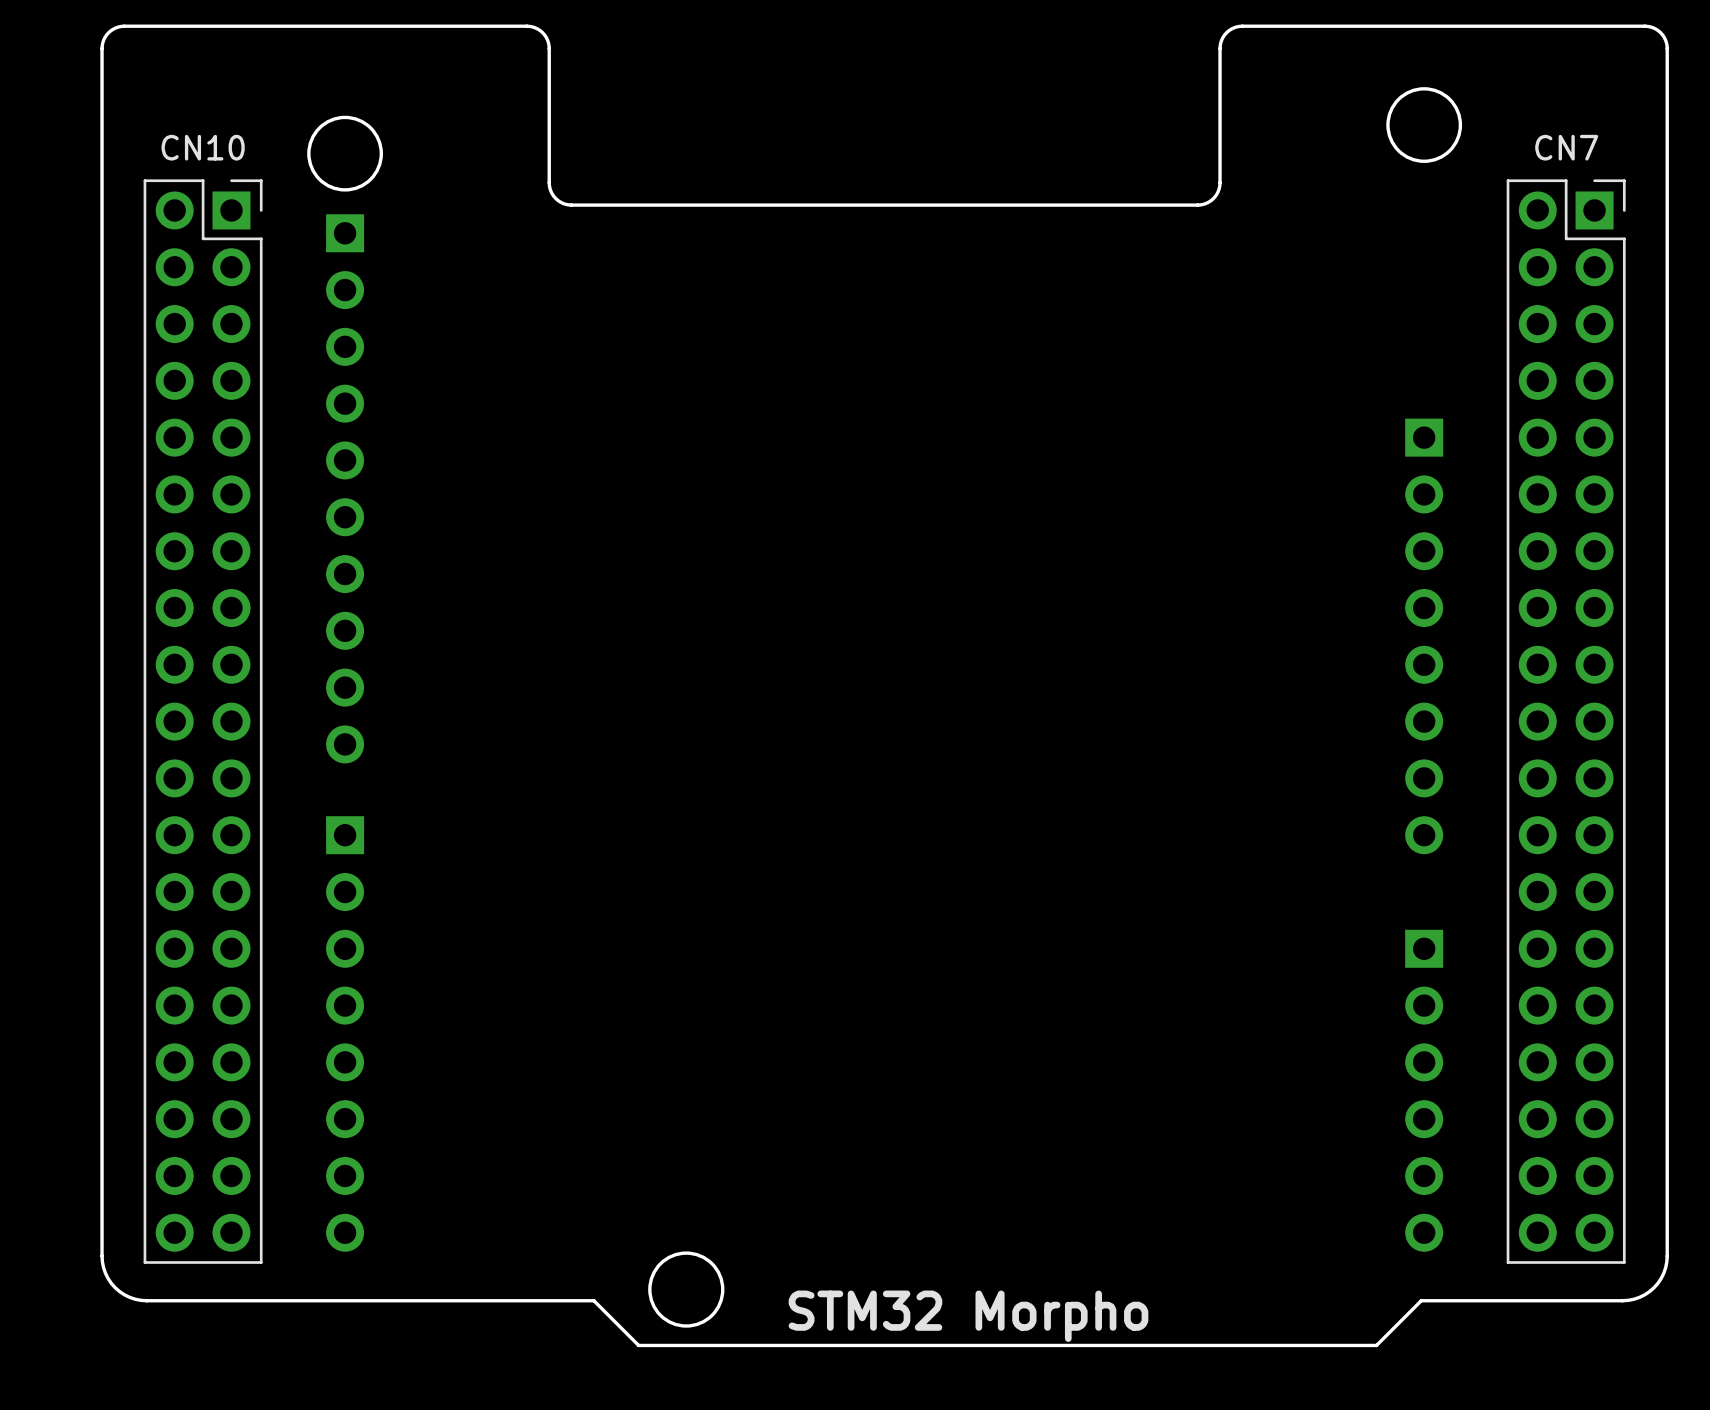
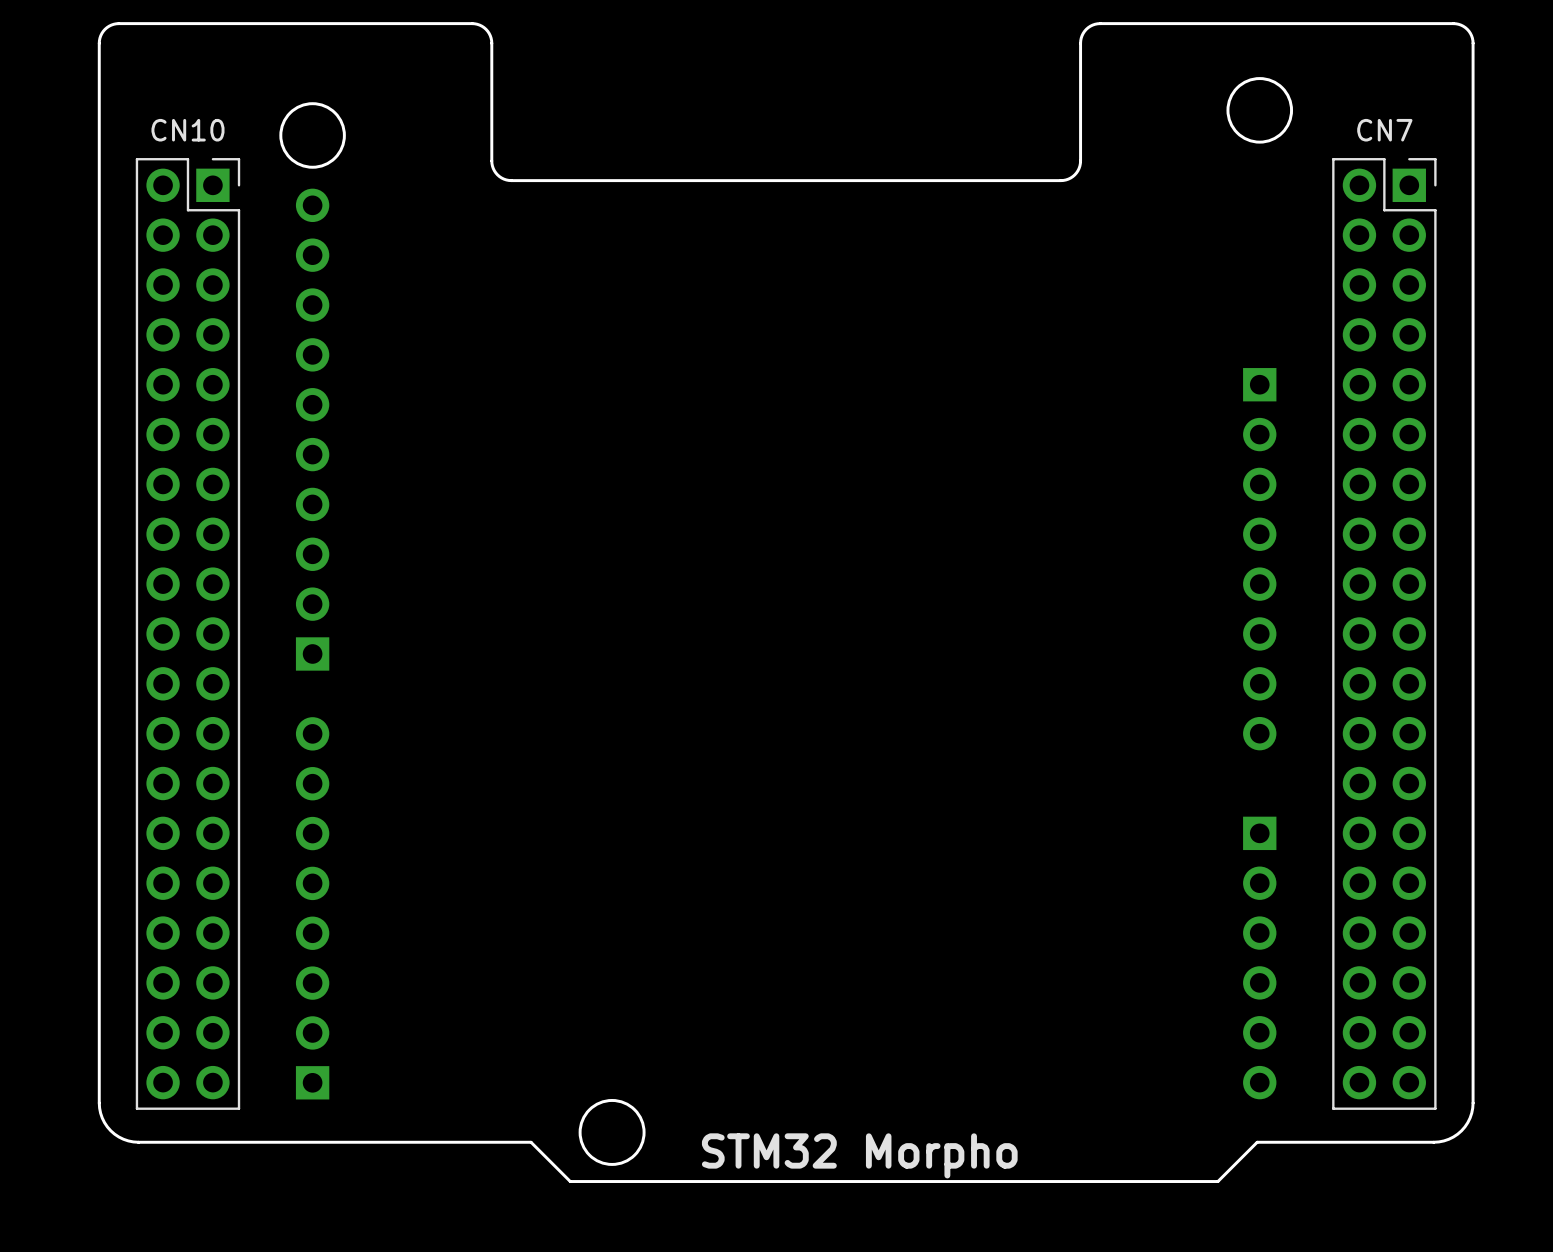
part rotation: 0° (345, 488) -> 180° (312, 429)
part rotation: 0° (345, 1033) -> 180° (312, 908)

